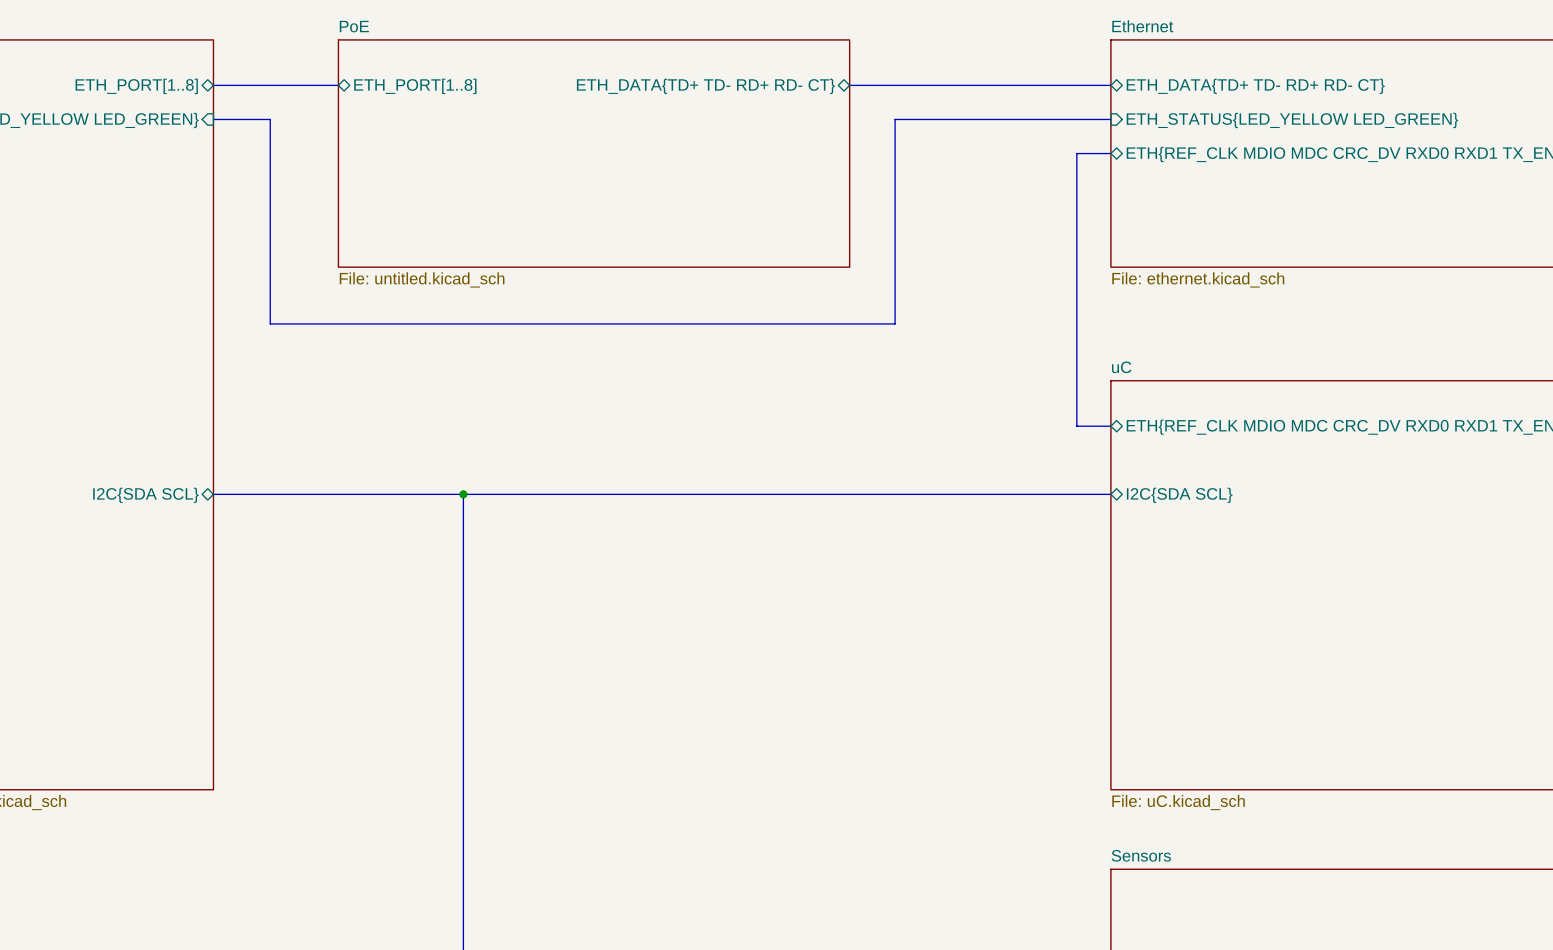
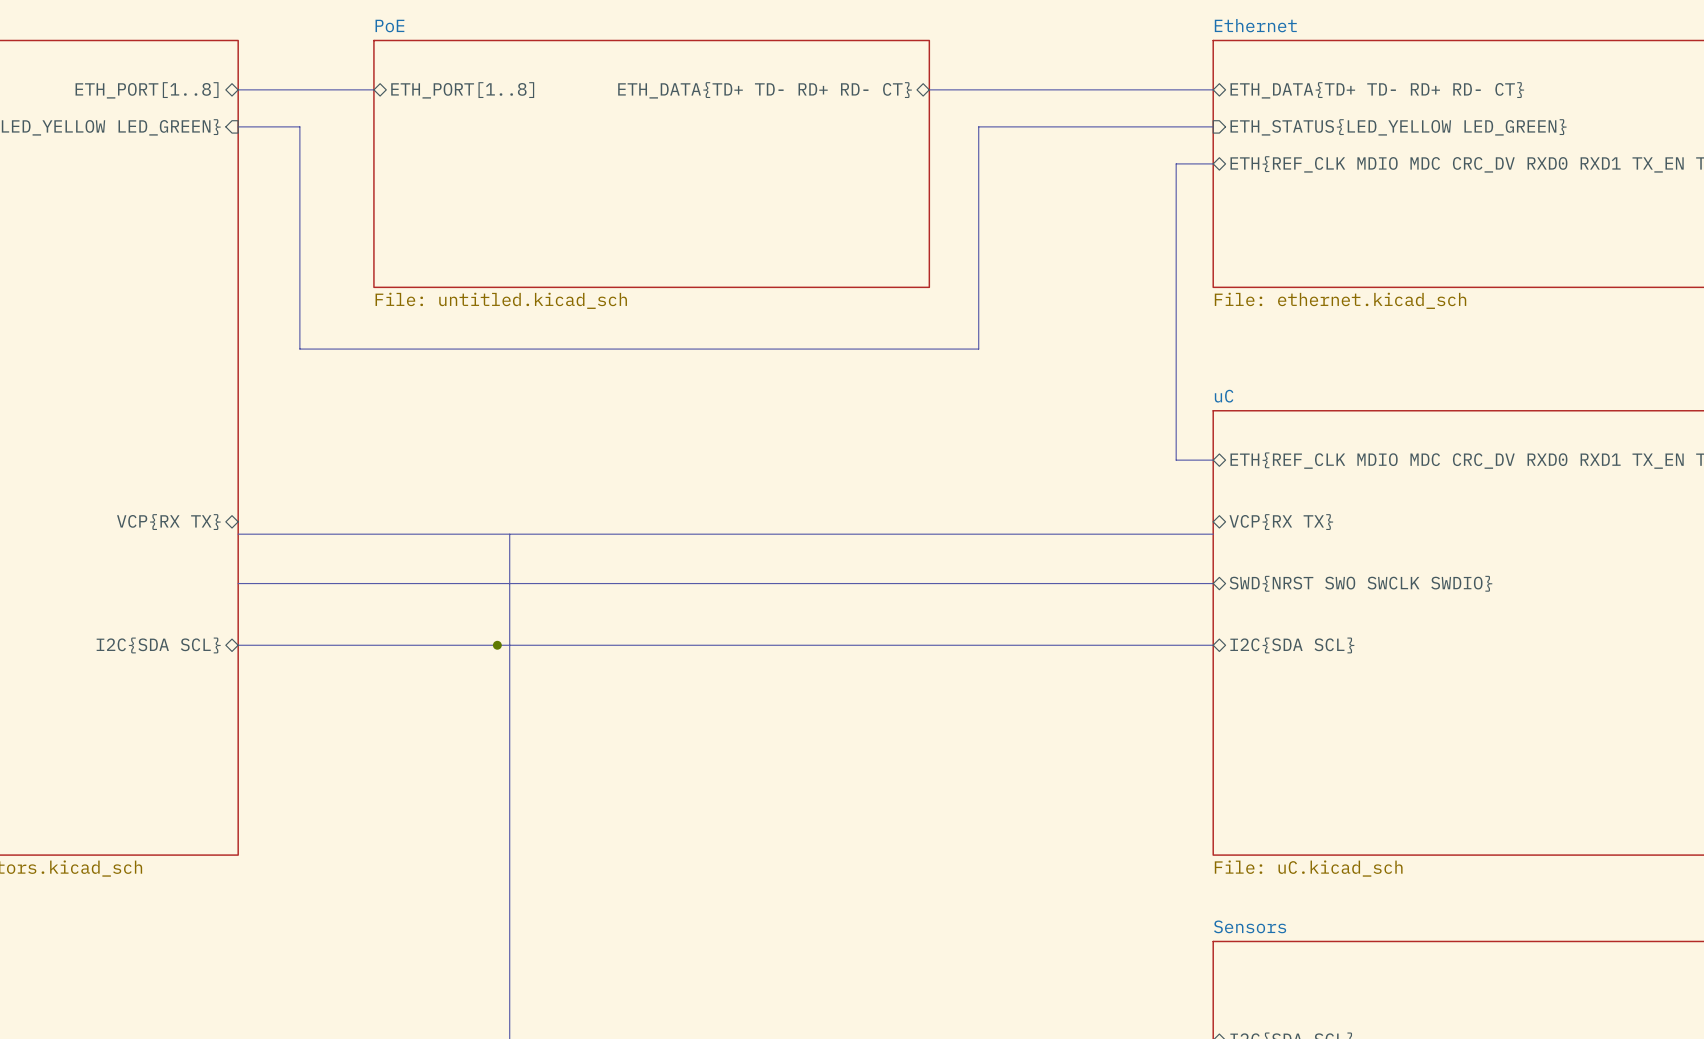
sheet pin: none -> VCP{RX TX} (168, 522)
sheet pin: none -> VCP{RX TX} (1281, 522)
junction: (463, 494) -> none
sheet pin position: I2C{SDA SCL} (145, 495) -> I2C{SDA SCL} (158, 645)
sheet pin position: I2C{SDA SCL} (1179, 495) -> I2C{SDA SCL} (1292, 645)
bus: none -> (238, 583) (1213, 583)
sheet pin: none -> SWD{NRST SWO SWCLK SWDIO} (1360, 583)
bus: none -> (238, 645) (1213, 645)
junction: none -> (497, 645)

